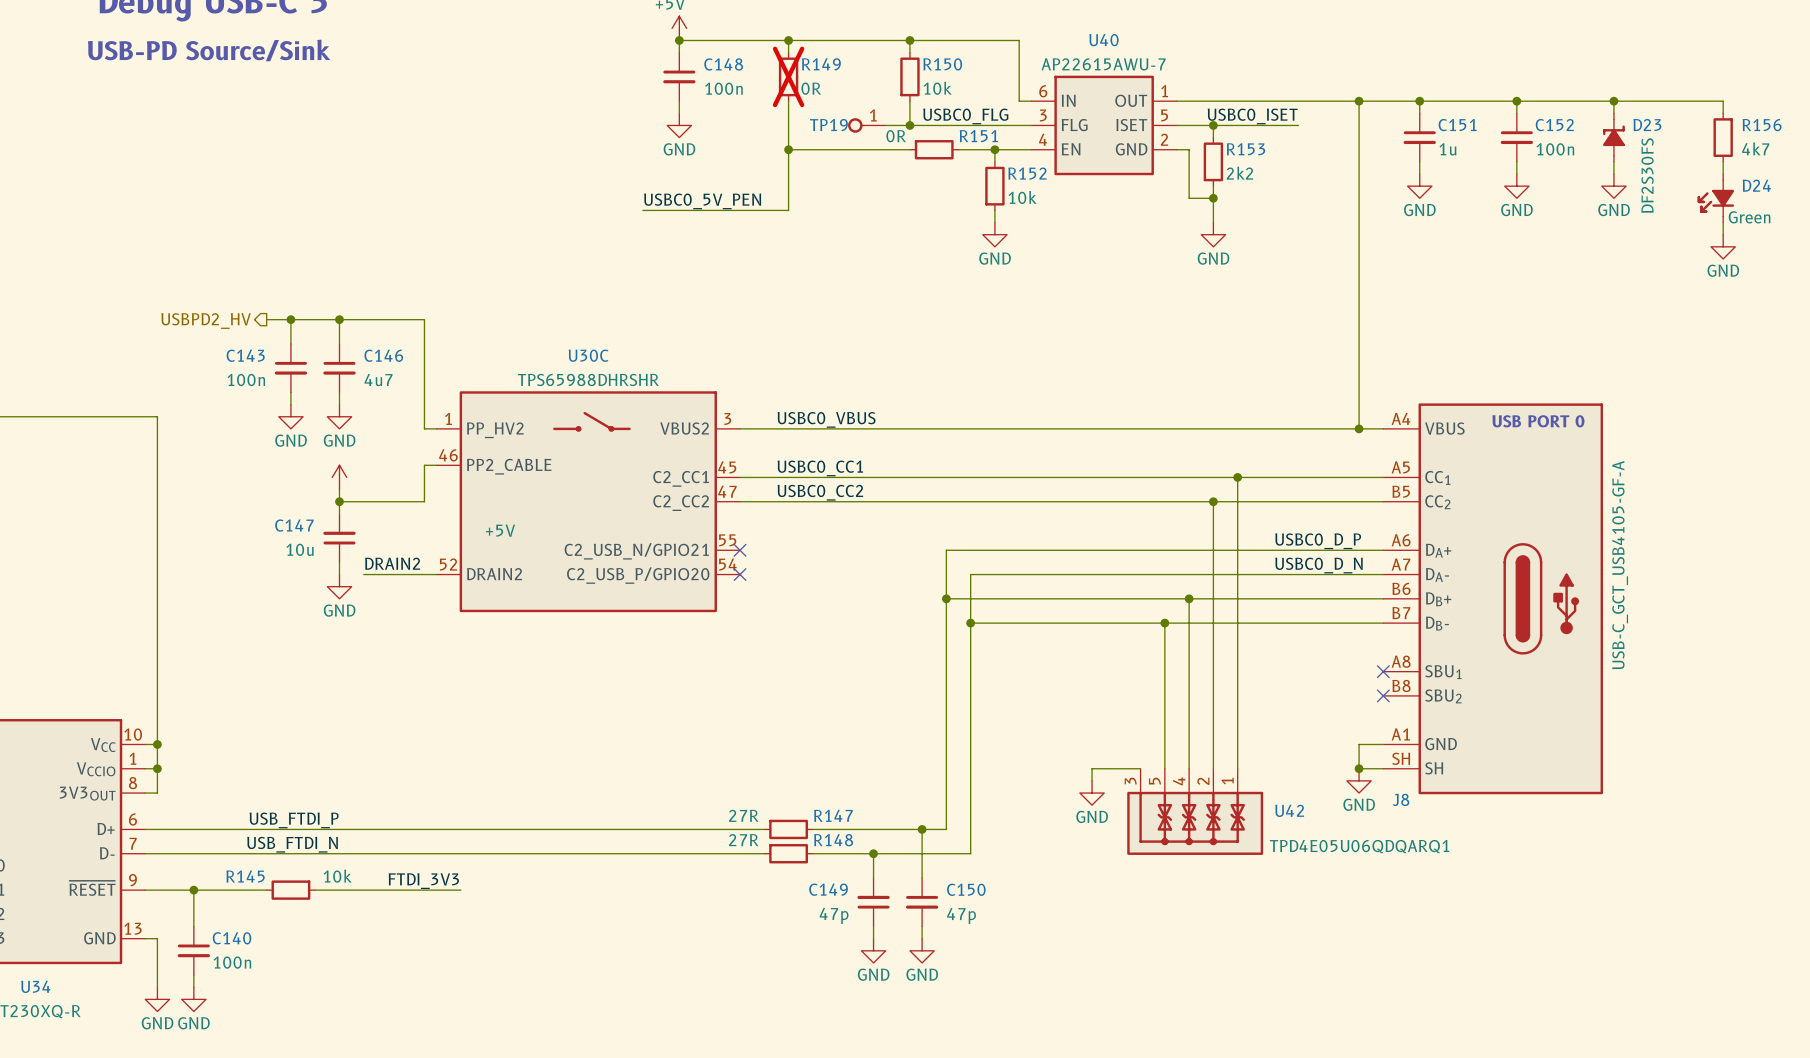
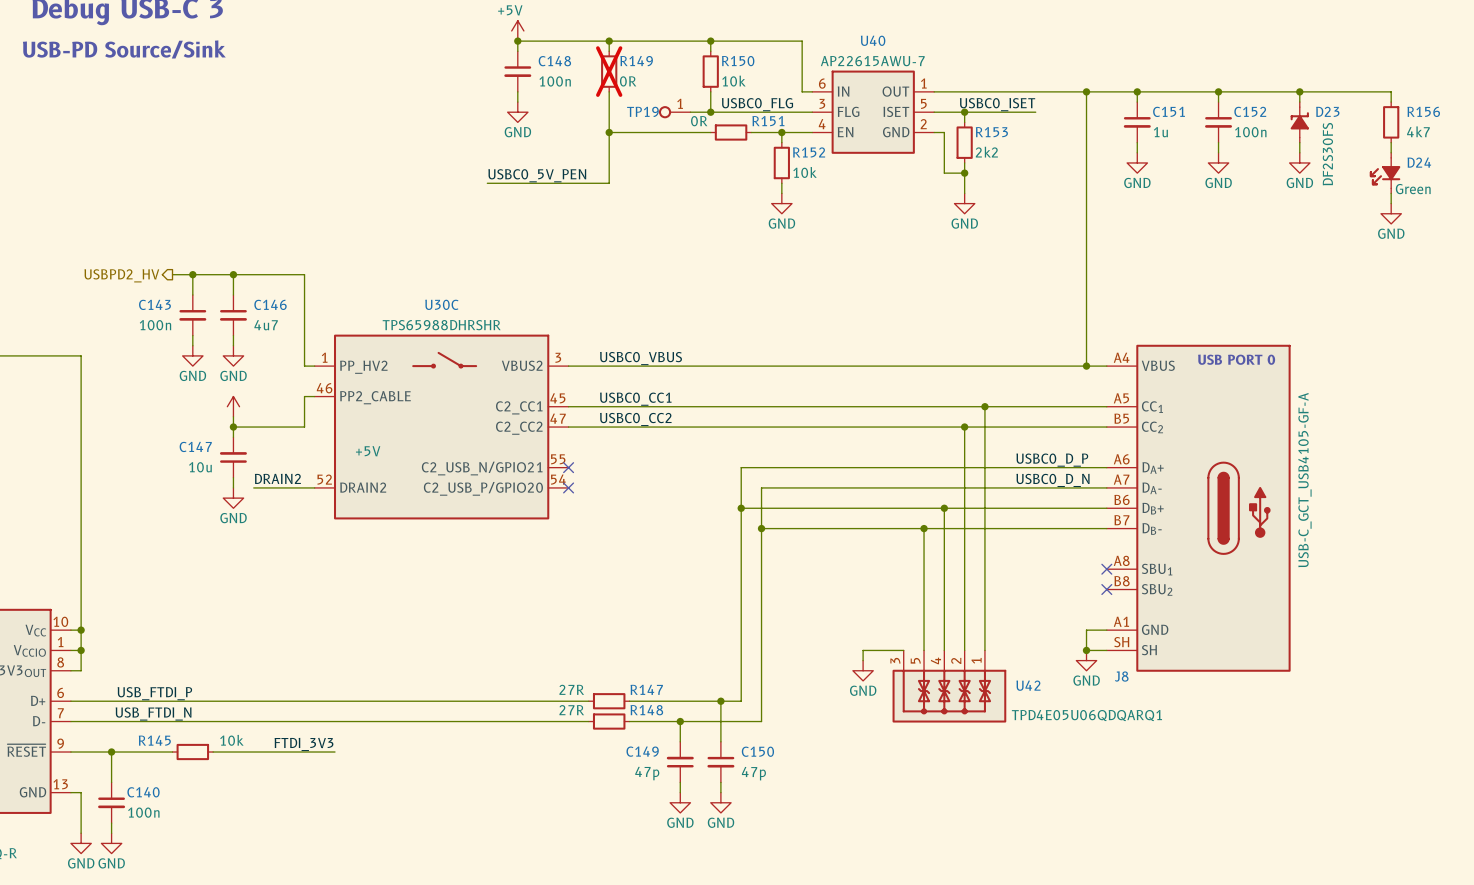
label position: USB_FTDI_P (294, 820) -> USB_FTDI_P (154, 693)
label position: USB_FTDI_N (292, 844) -> USB_FTDI_N (153, 713)

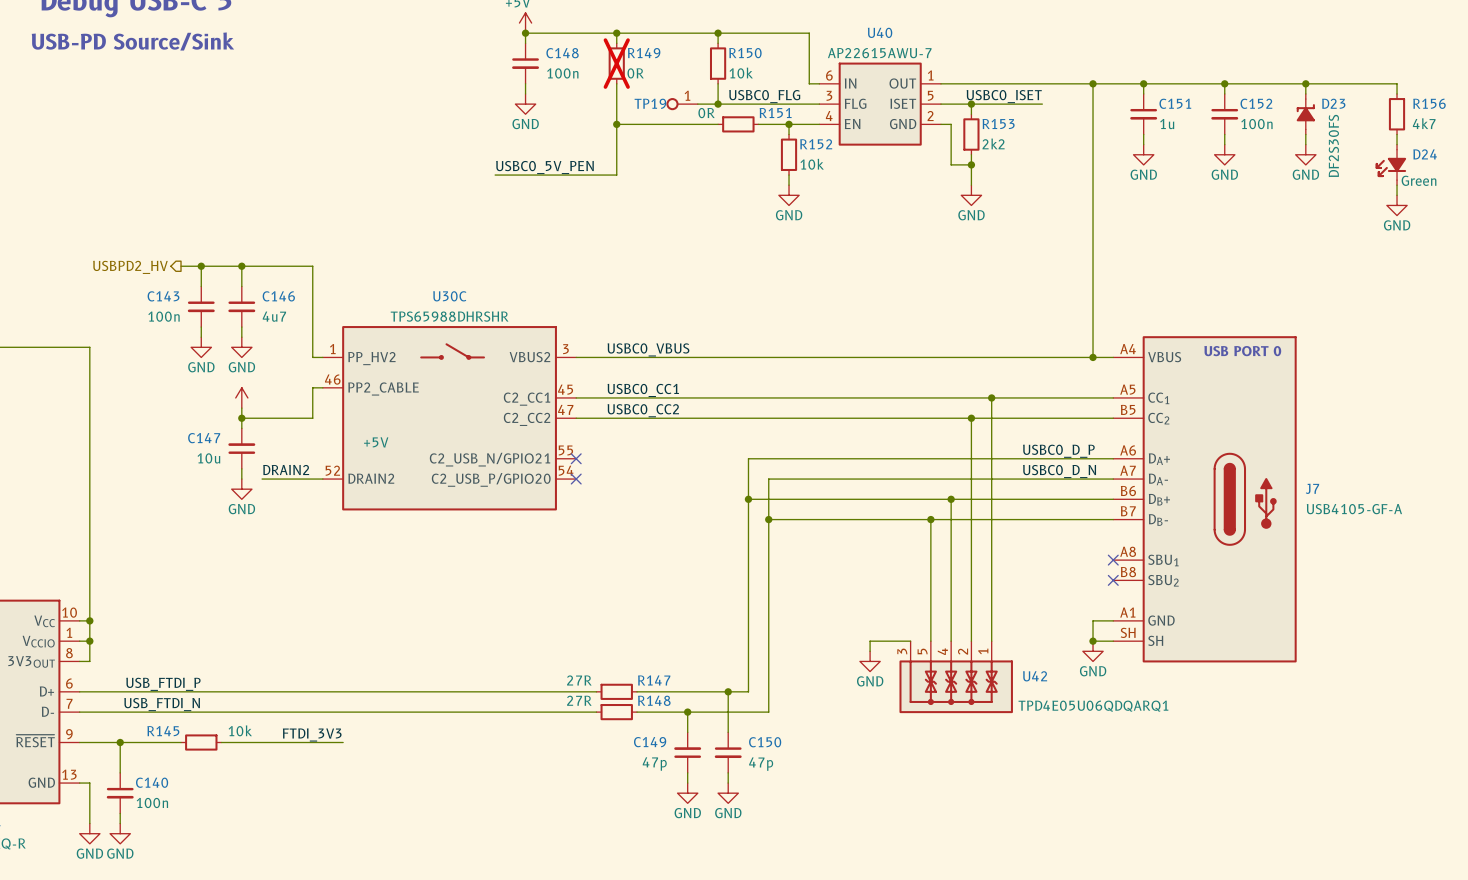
J8 value: USB-C_GCT_USB4105-GF-A (1304, 480) -> none
J8 text: none -> USB4105-GF-A (1354, 509)
J8 name: J8 (1121, 676) -> J7 (1312, 488)

